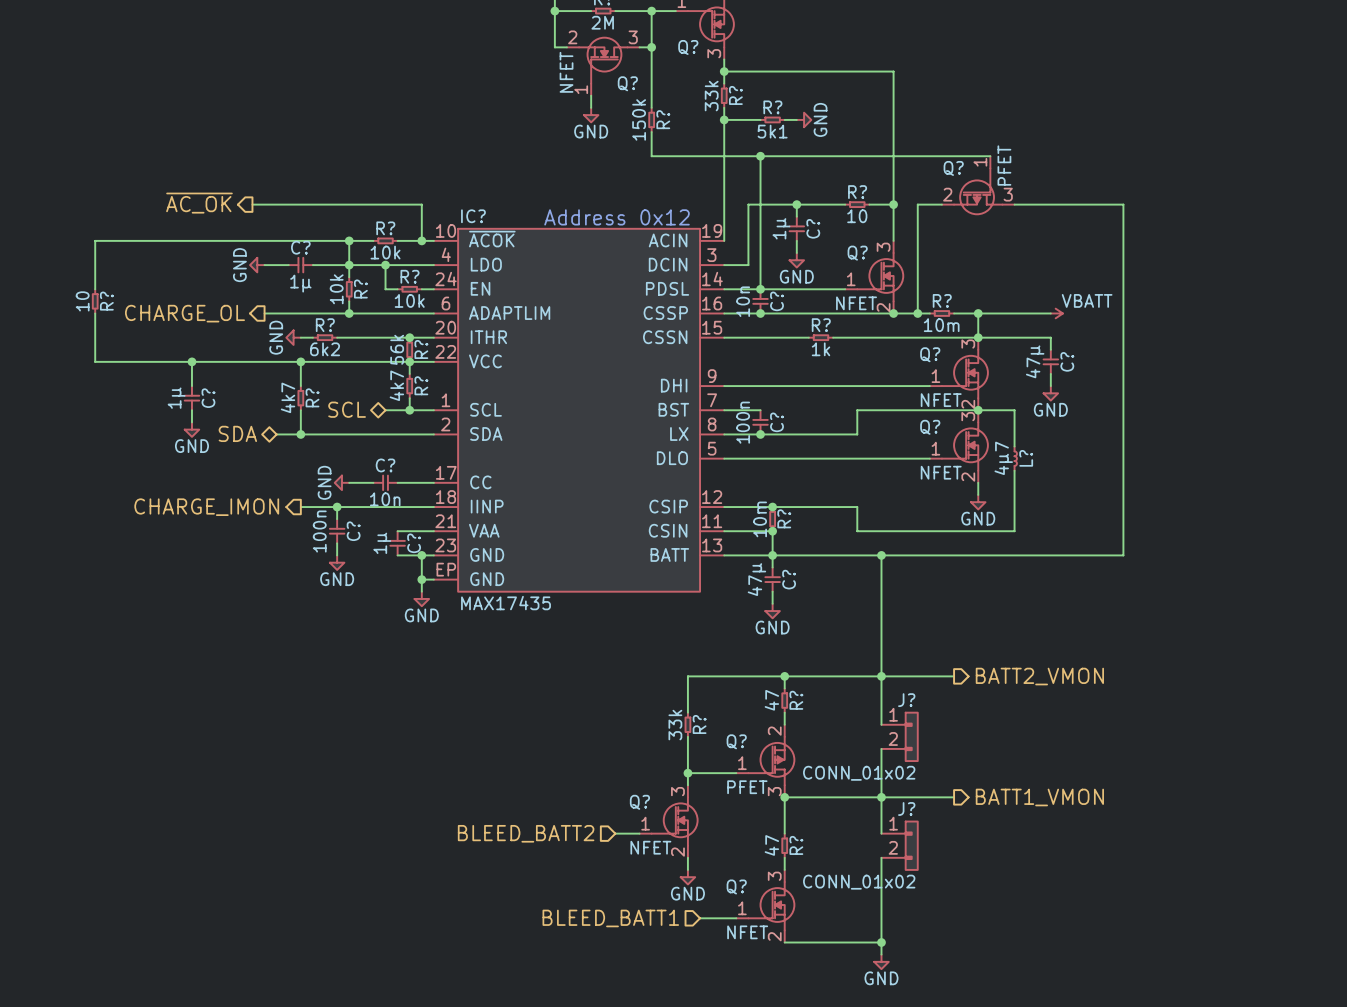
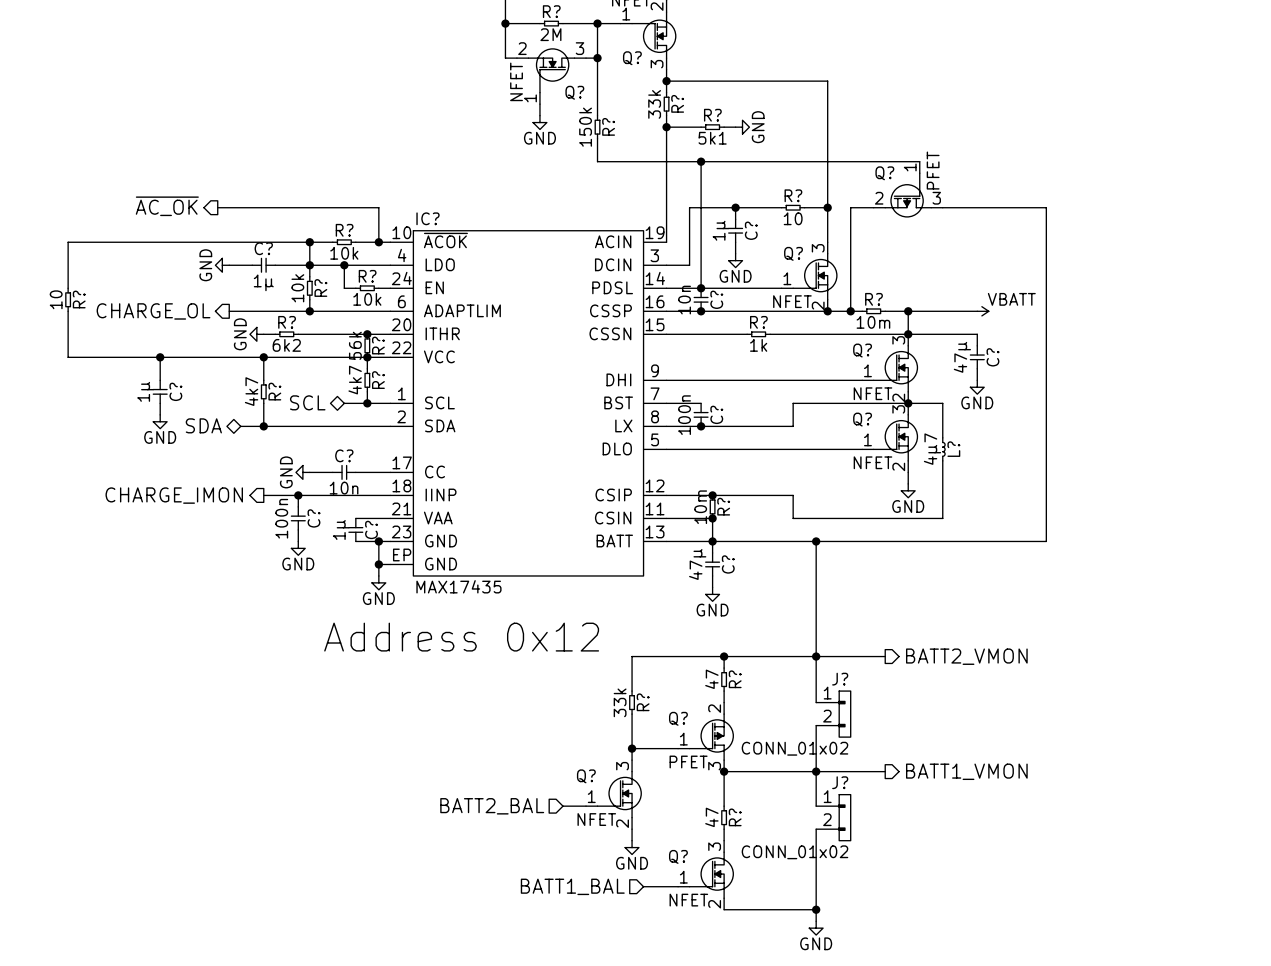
text: Address 0x12 (617, 217) -> none
text: none -> Address 0x12 (461, 637)
hierarchical label: BLEED_BATT2 (526, 833) -> BATT2_BAL (492, 806)
hierarchical label: BLEED_BATT1 (610, 918) -> BATT1_BAL (572, 886)

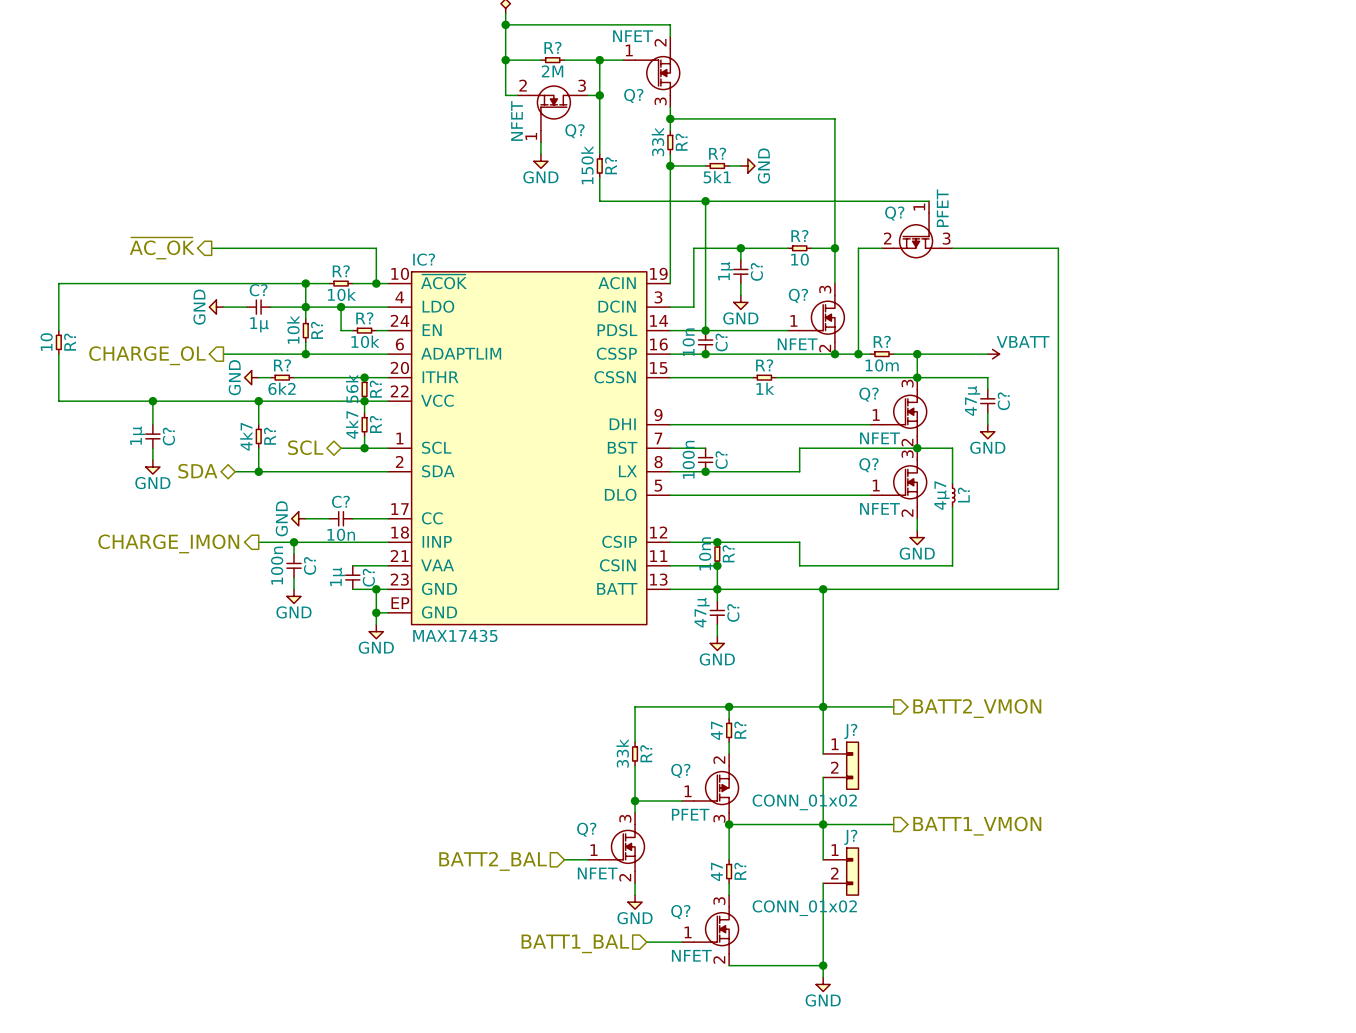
text: Address 0x12 (461, 637) -> none

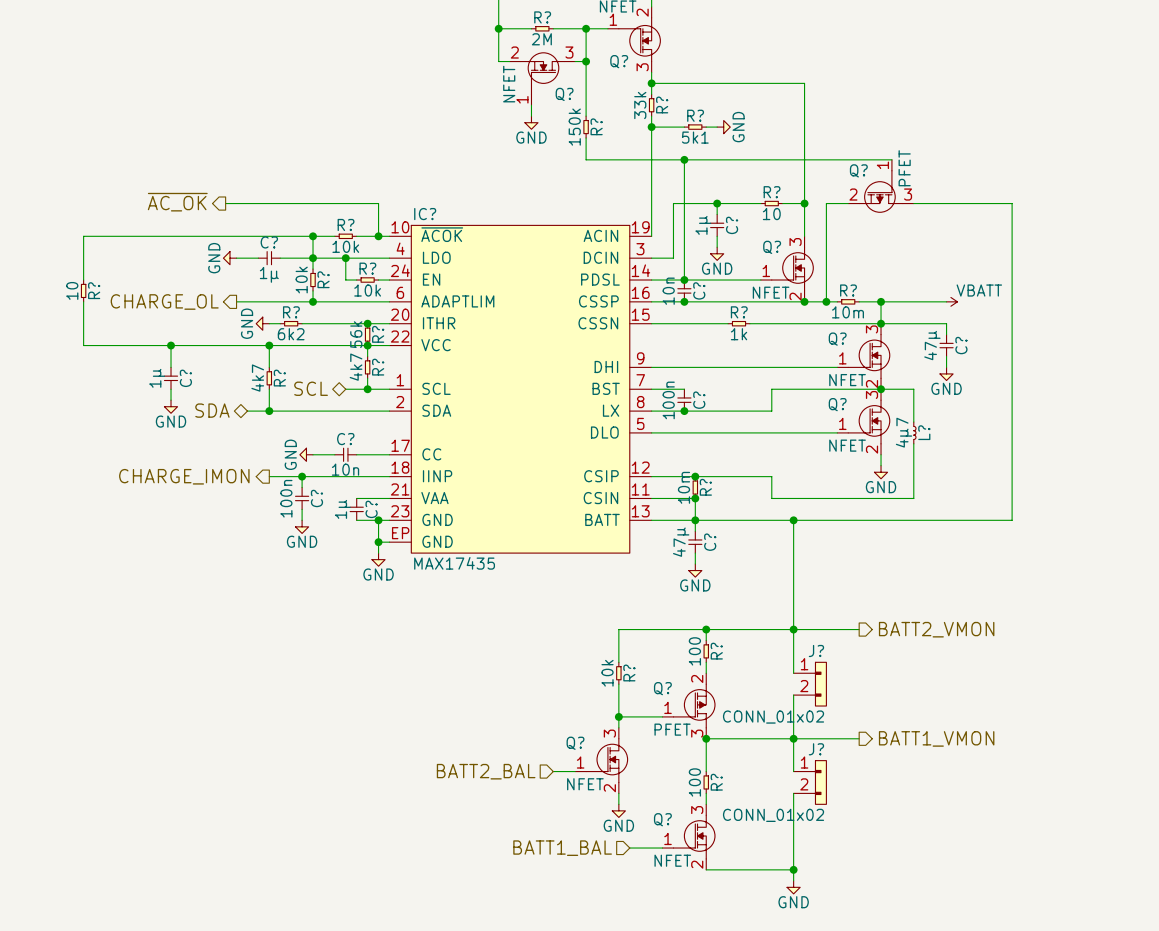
R? value: 47 (716, 730) -> 100 (694, 651)
R? value: 33k (622, 753) -> 10k (607, 673)
R? value: 47 (716, 871) -> 100 (694, 782)

